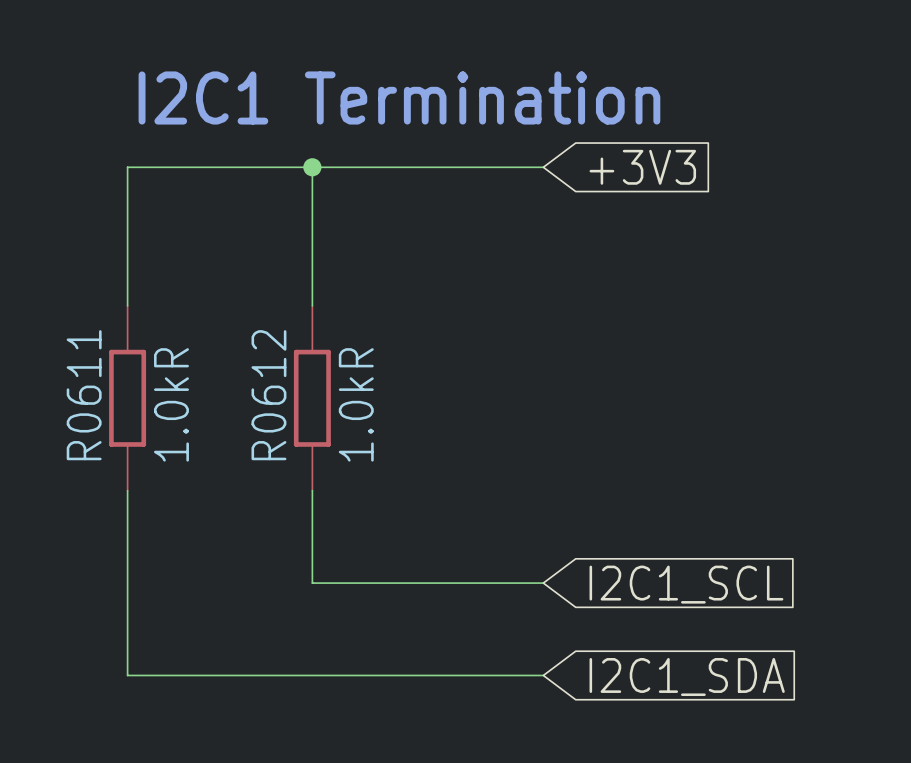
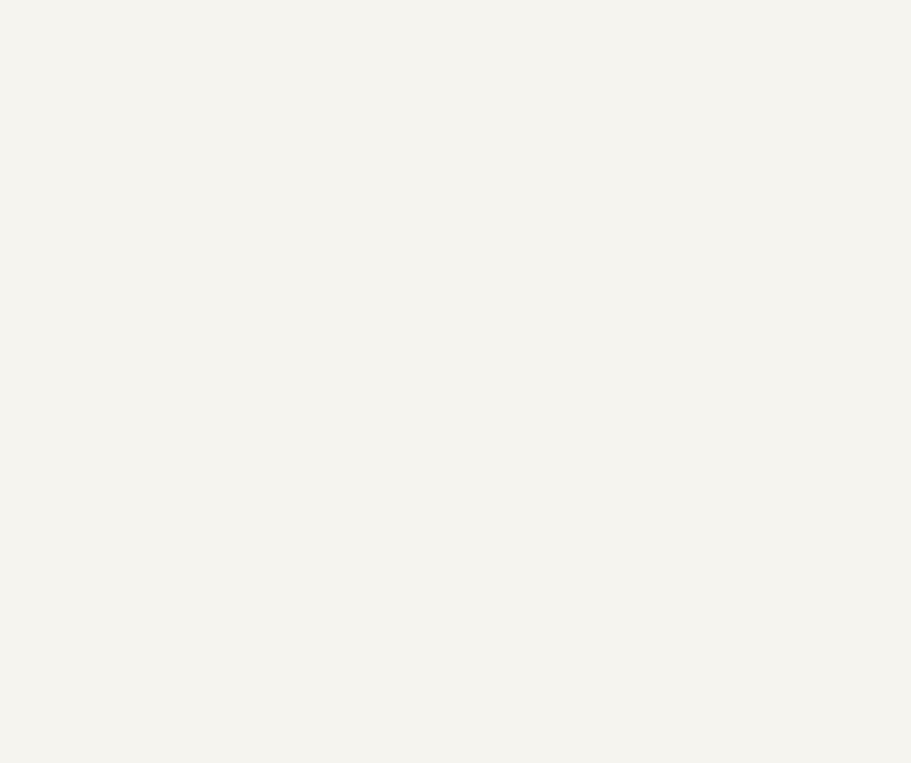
text: I2C1 Termination (399, 97) -> none
wire: (312, 167) (312, 305) -> none
junction: (312, 167) -> none
wire: (543, 167) (127, 167) (127, 305) -> none
global label: +3V3 (642, 167) -> none
R0611: 1.0kR (127, 398) -> none
R0612: 1.0kR (312, 398) -> none
wire: (127, 490) (127, 675) (543, 675) -> none
wire: (312, 490) (312, 583) (543, 583) -> none
global label: I2C1_SCL (686, 584) -> none
global label: I2C1_SDA (687, 677) -> none

